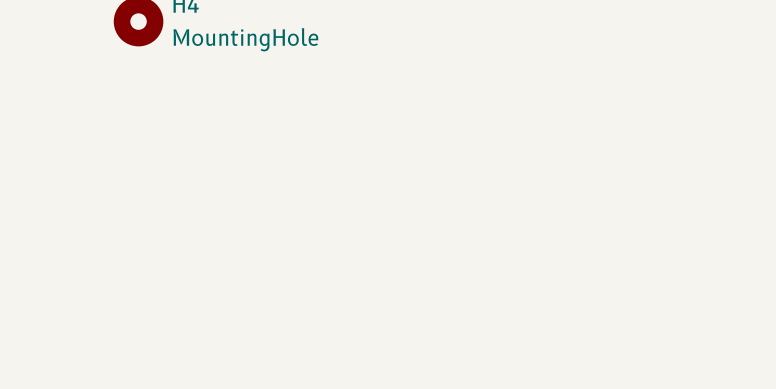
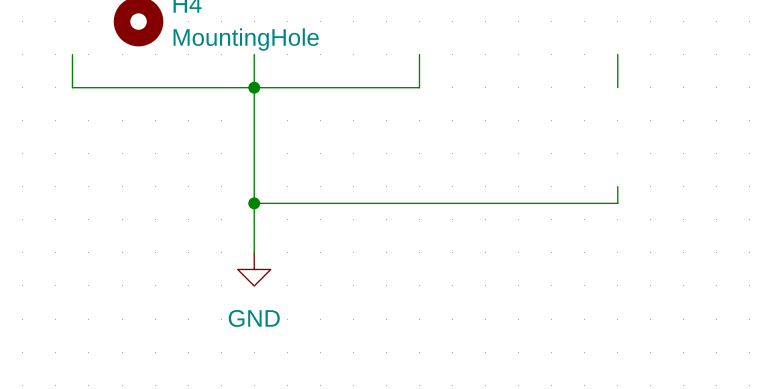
wire: none -> (72, 54) (72, 87) (419, 87) (419, 54)
wire: none -> (254, 54) (254, 252)
wire: none -> (617, 54) (617, 87)
junction: none -> (254, 87)
wire: none -> (617, 186) (617, 203) (254, 203)
junction: none -> (254, 203)
power symbol: none -> GND (254, 269)

